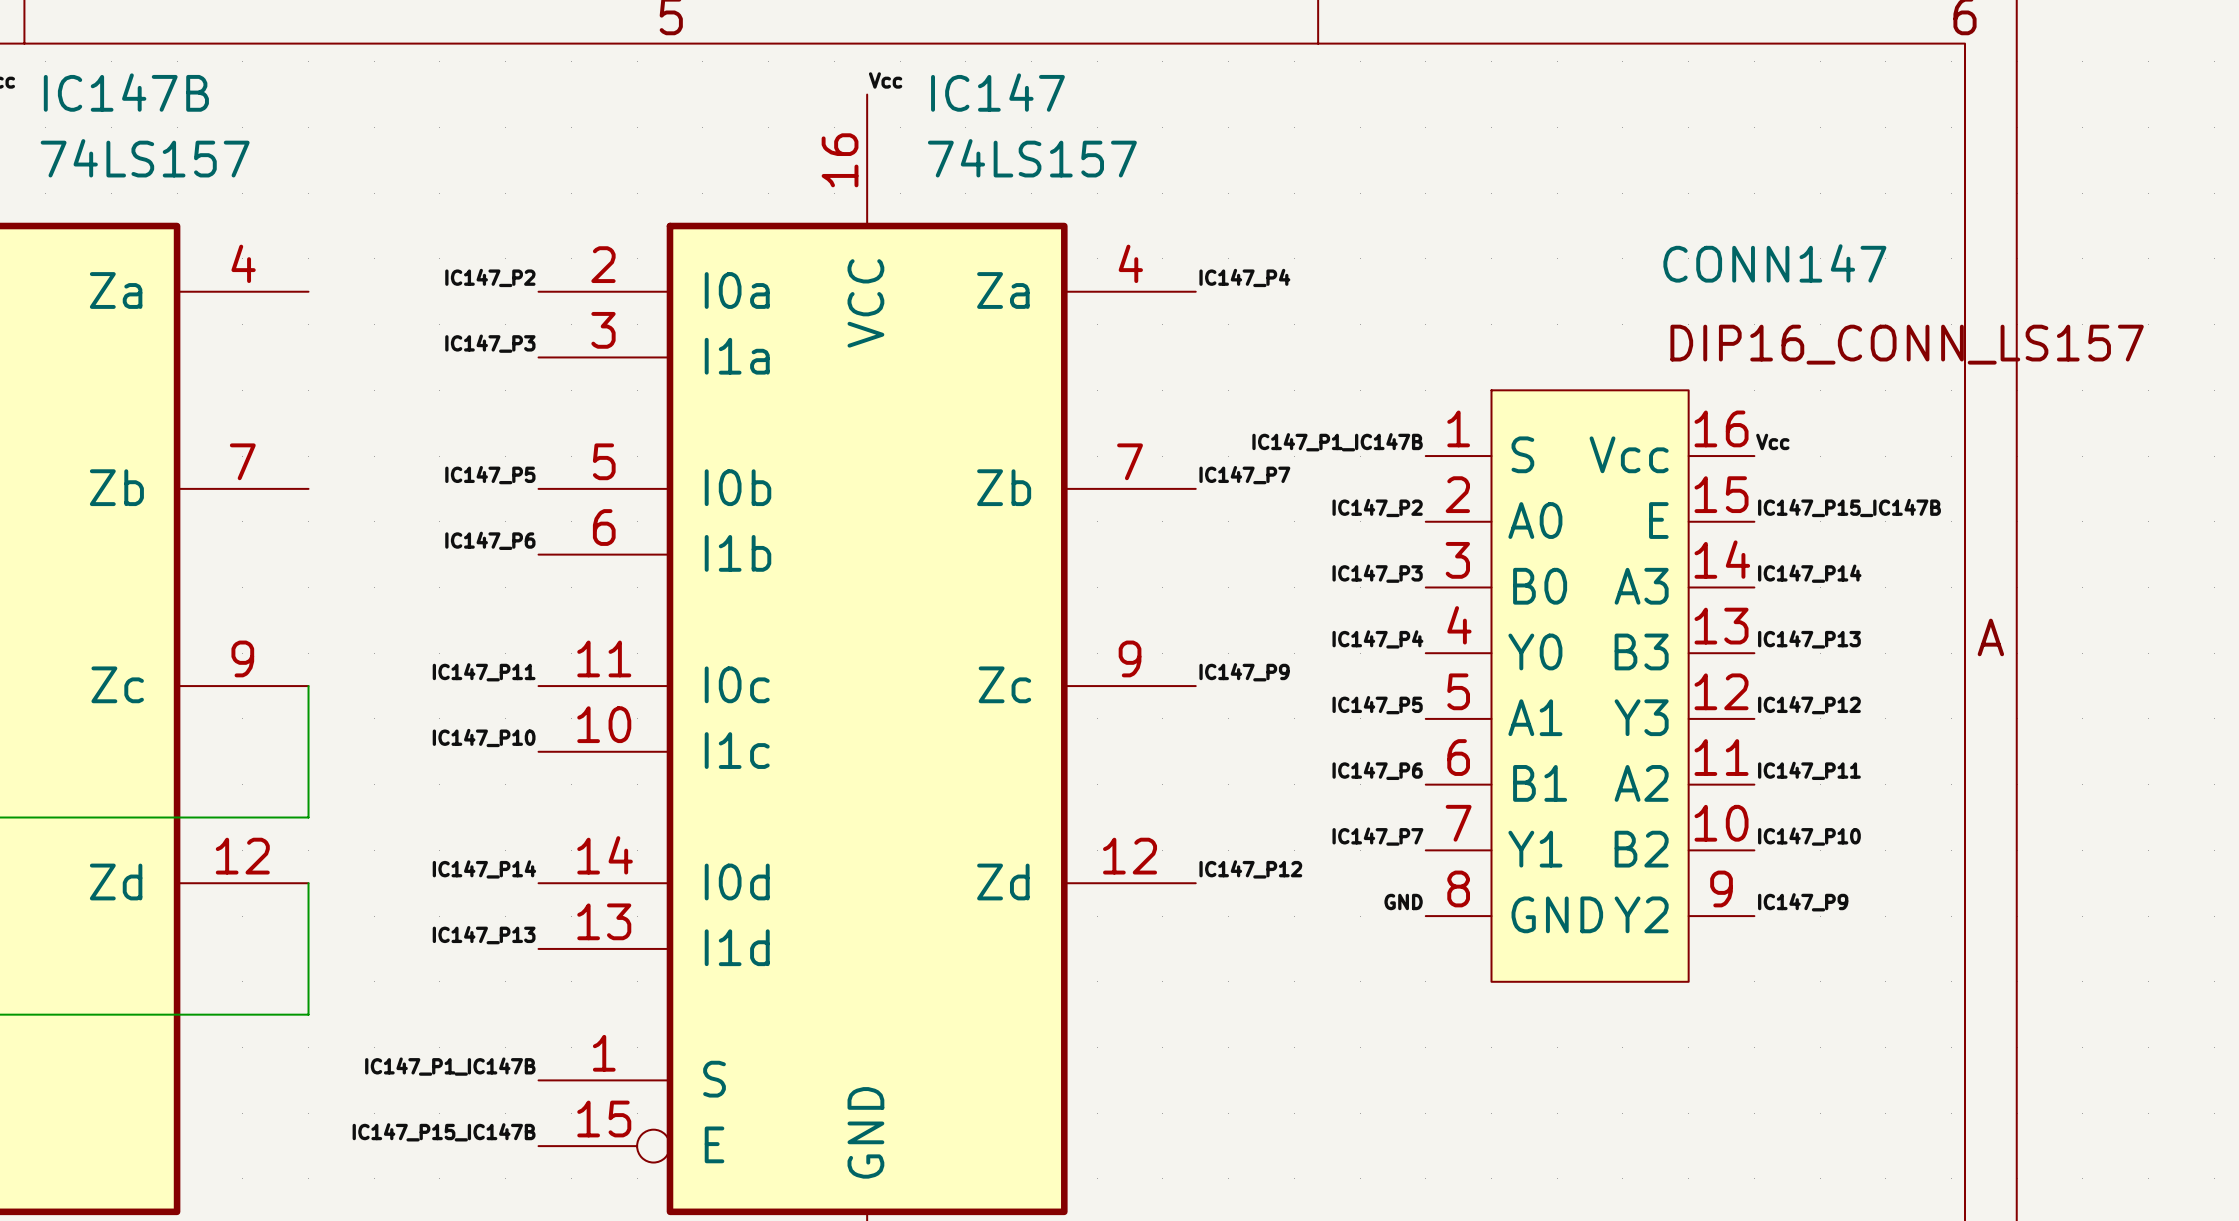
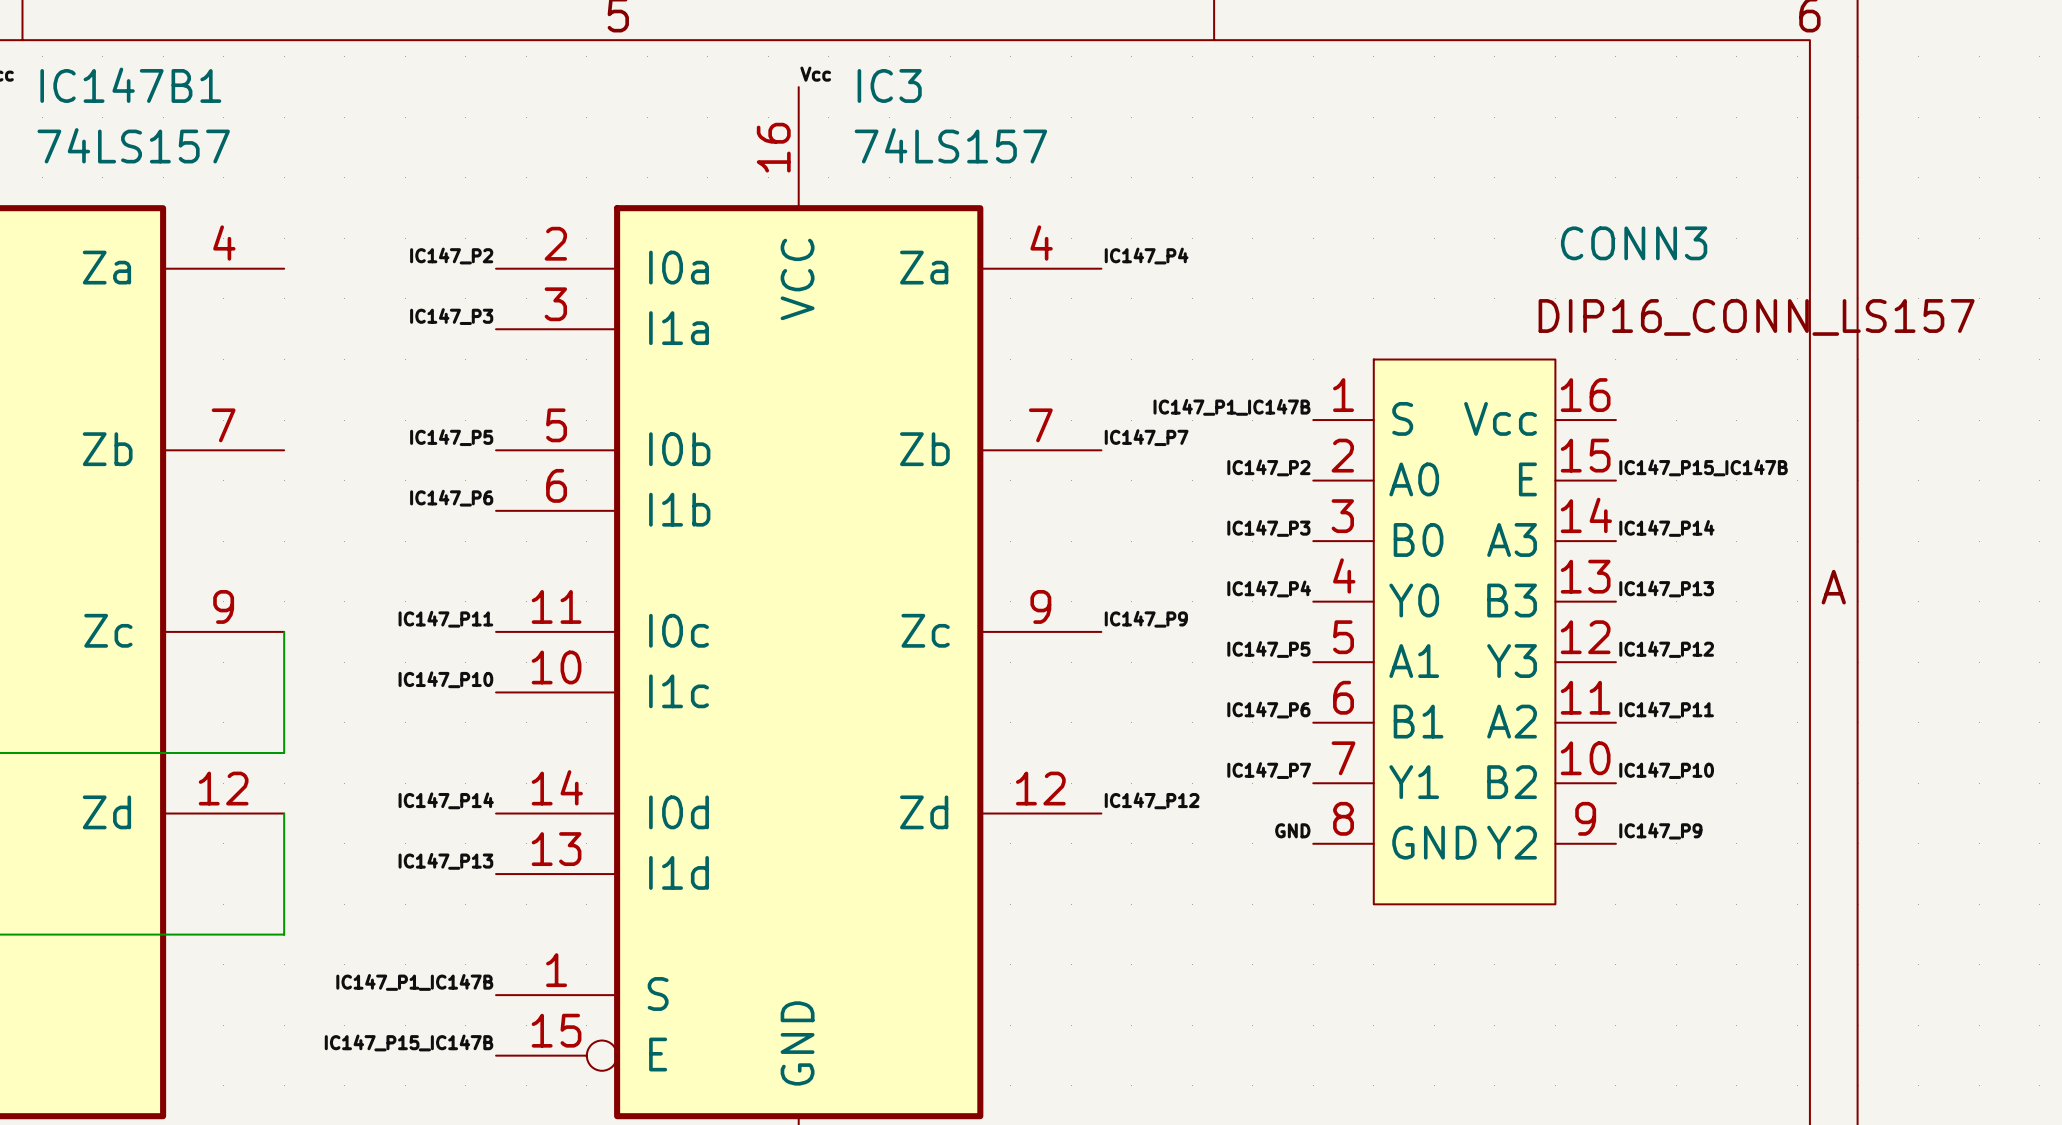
IC147B name: IC147B (126, 92) -> IC147B1 (130, 85)
IC147 name: IC147 (997, 92) -> IC3 (889, 85)
CONN147 name: CONN147 (1774, 263) -> CONN3 (1634, 243)
label: Vcc (1772, 441) -> none

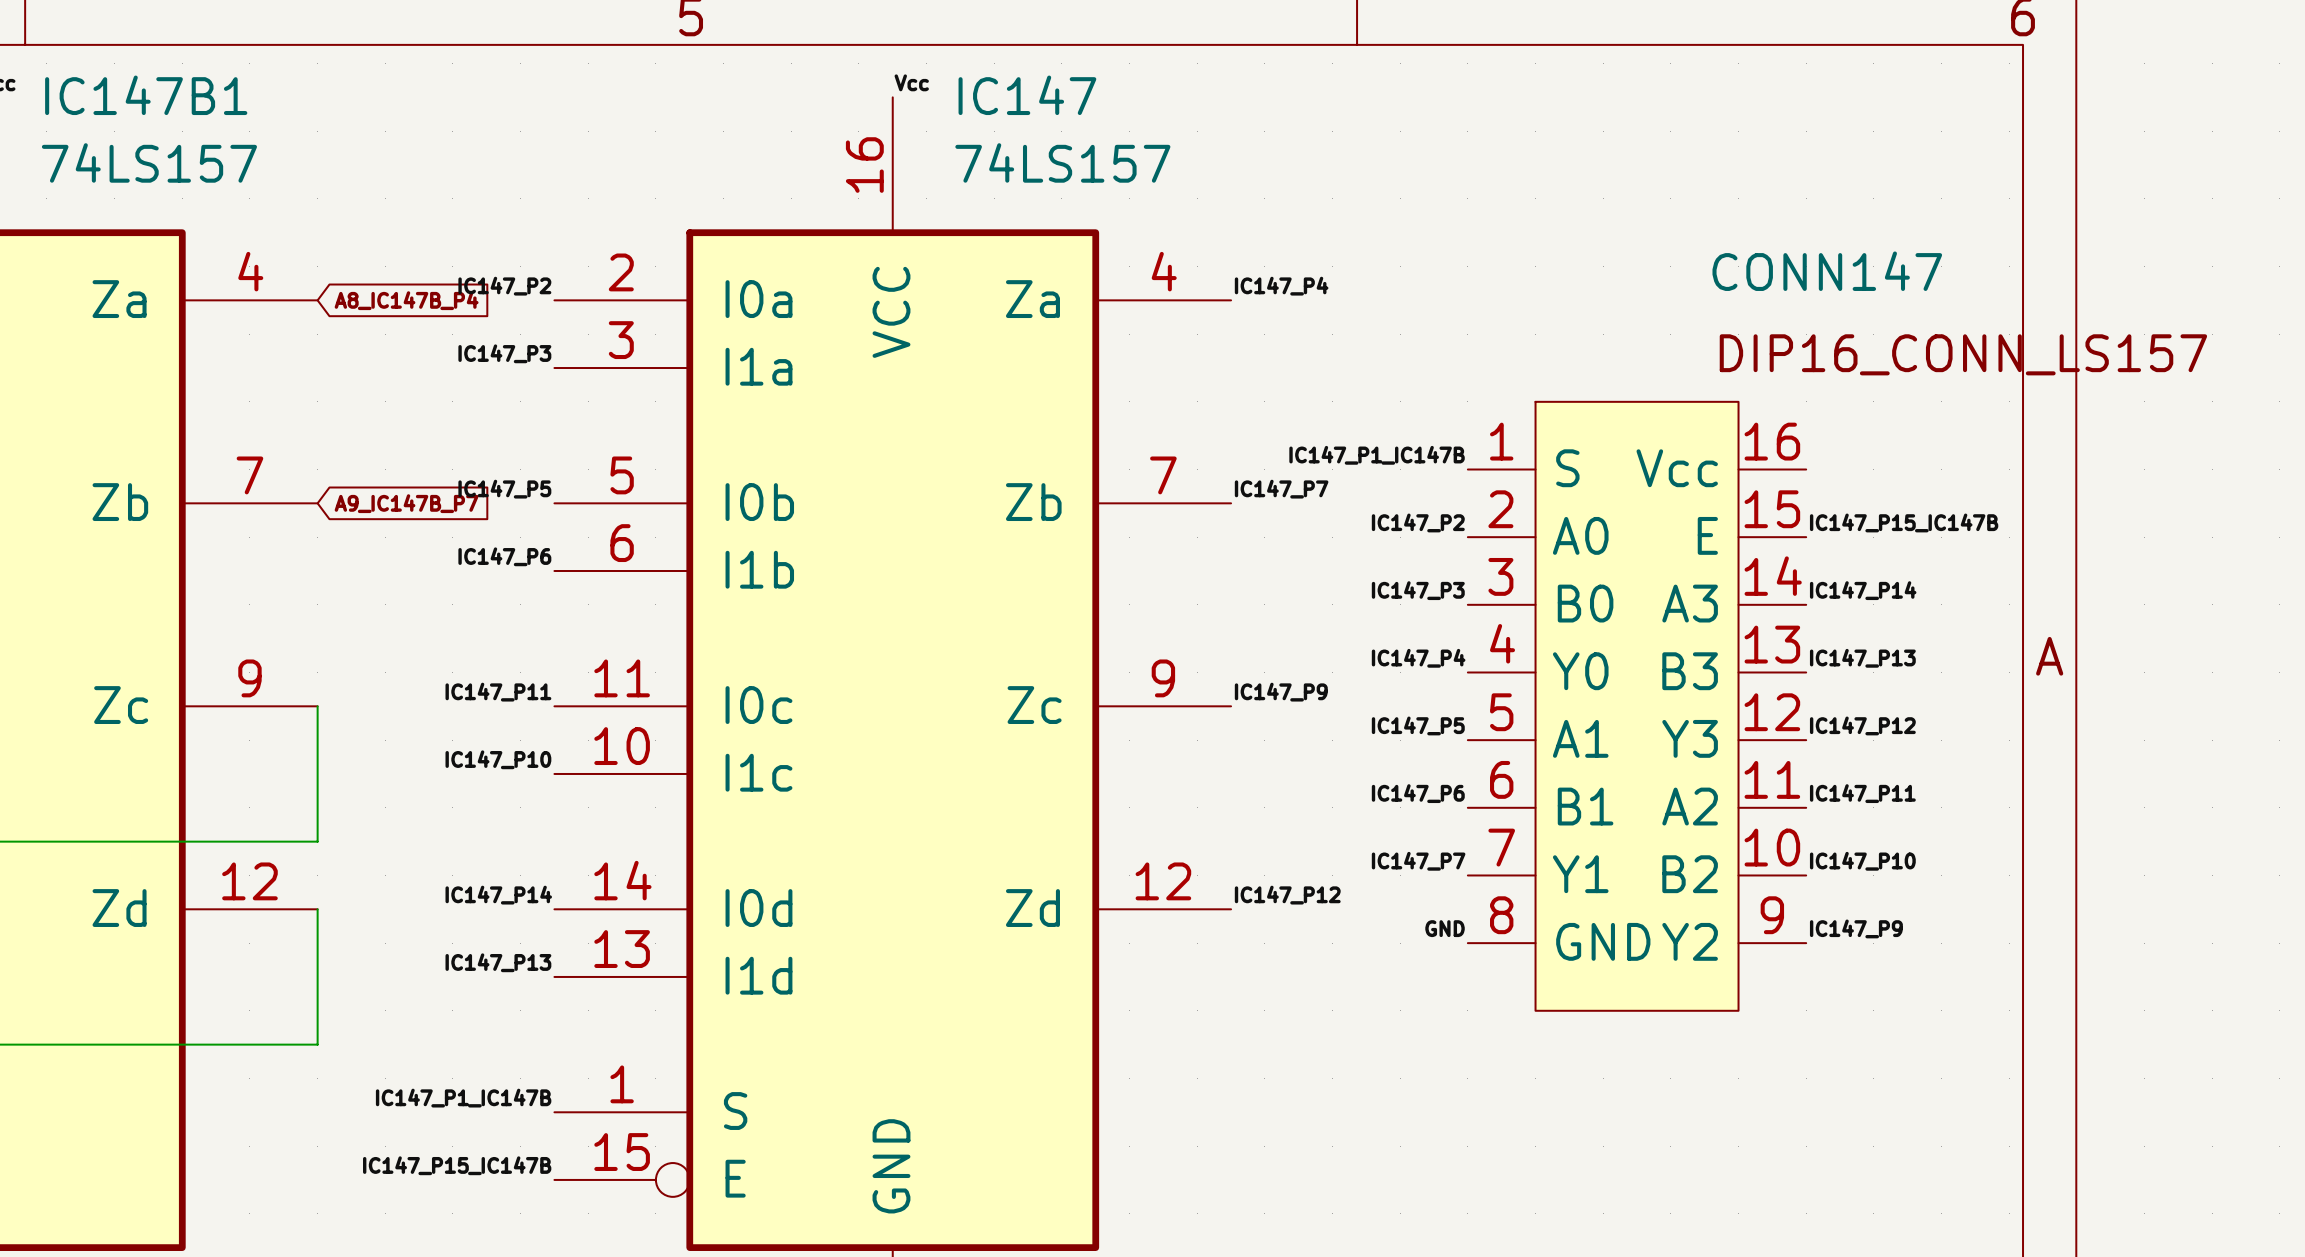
IC3 name: IC3 (889, 85) -> IC147 (1027, 95)
CONN3 name: CONN3 (1634, 243) -> CONN147 (1827, 271)
global label: none -> A8_IC147B_P4 (406, 300)
global label: none -> A9_IC147B_P7 (406, 503)

